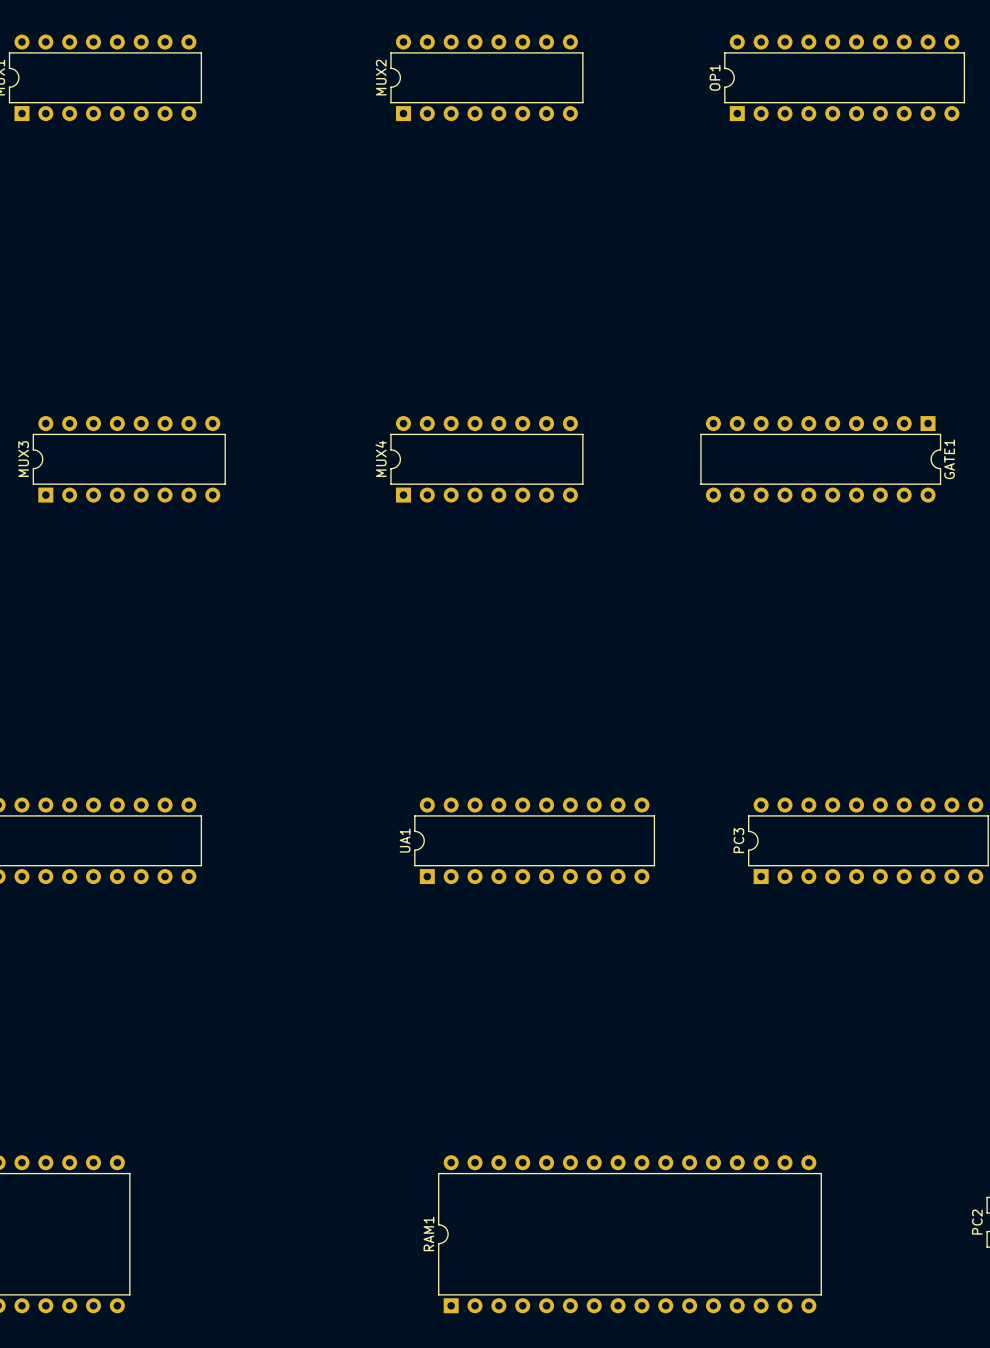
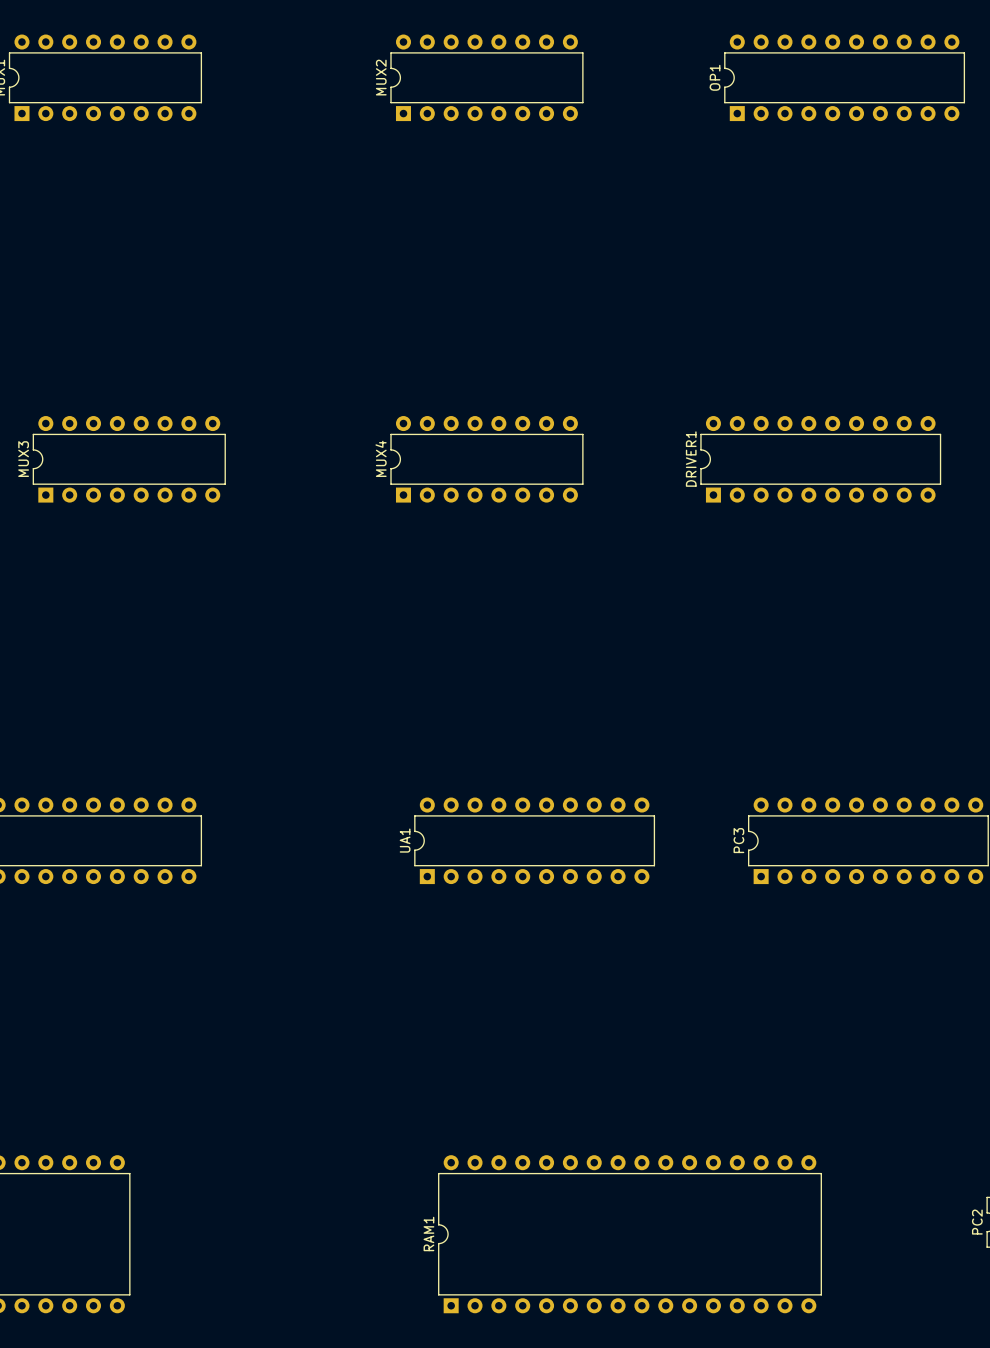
GATE1: (820, 459) -> none
DRIVER1: none -> (820, 459)

